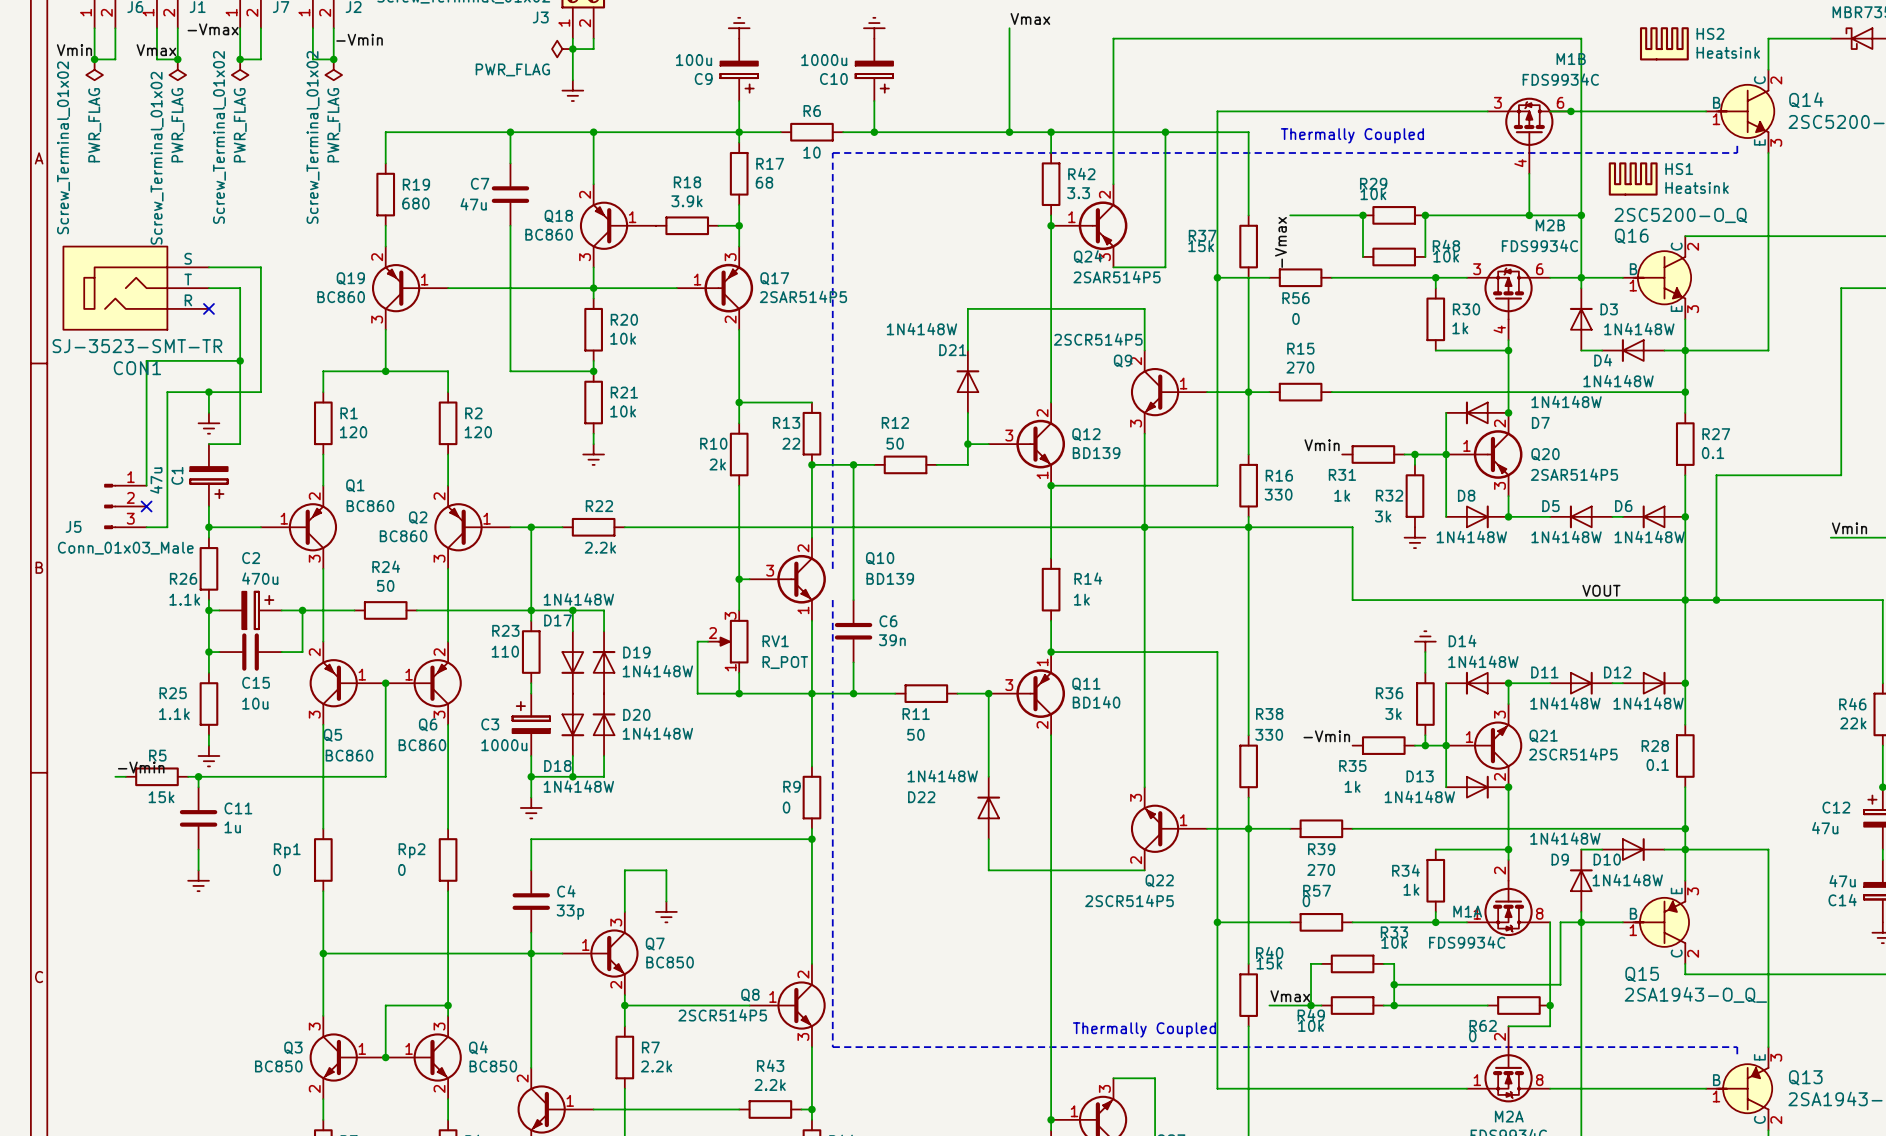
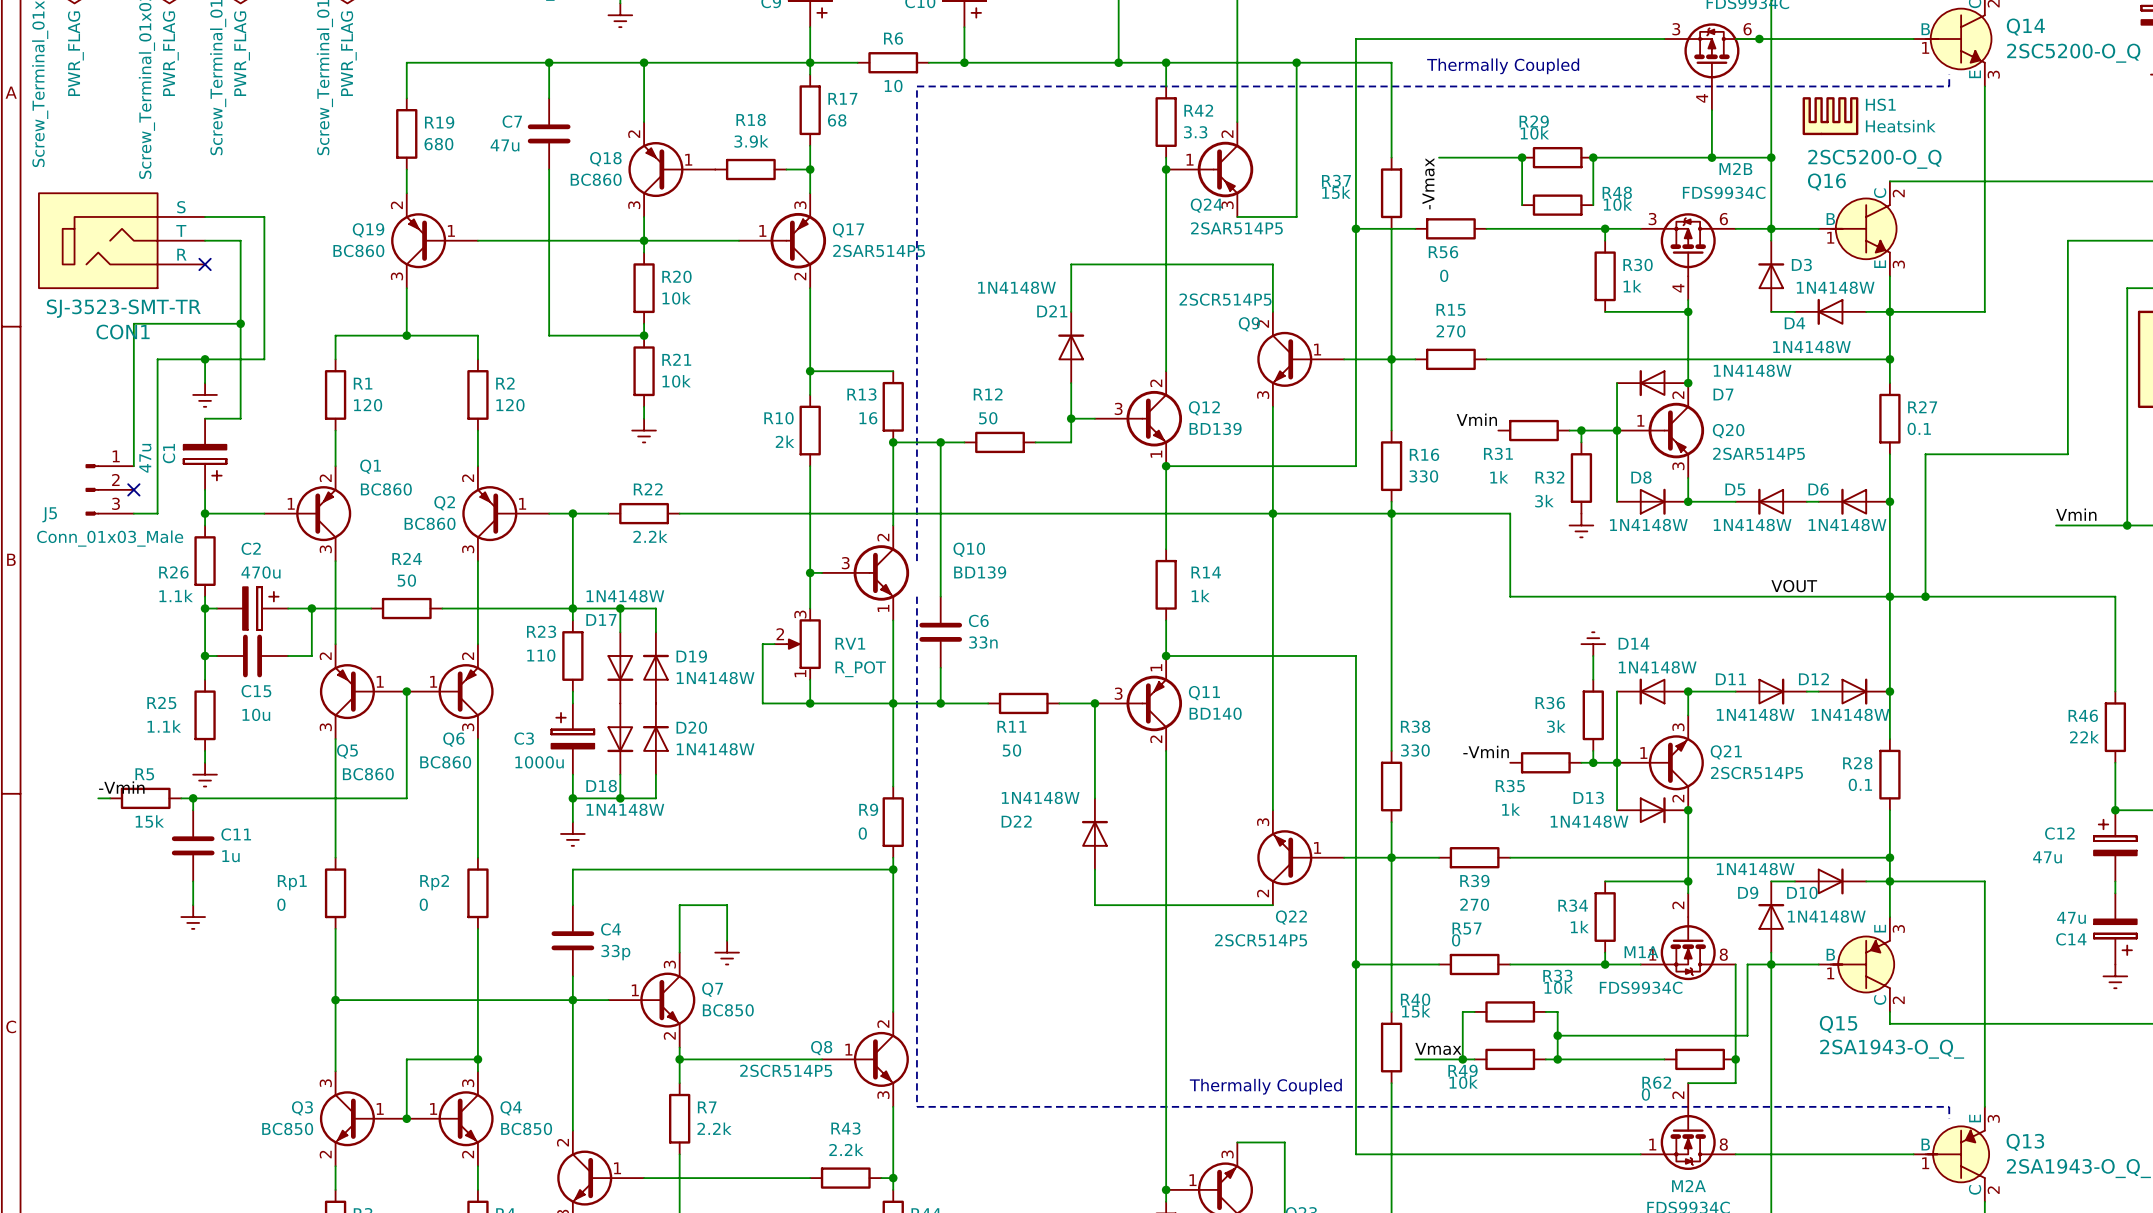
R13 value: 22 (791, 443) -> 16 (868, 418)
C6 value: 39n (892, 640) -> 33n (983, 642)

